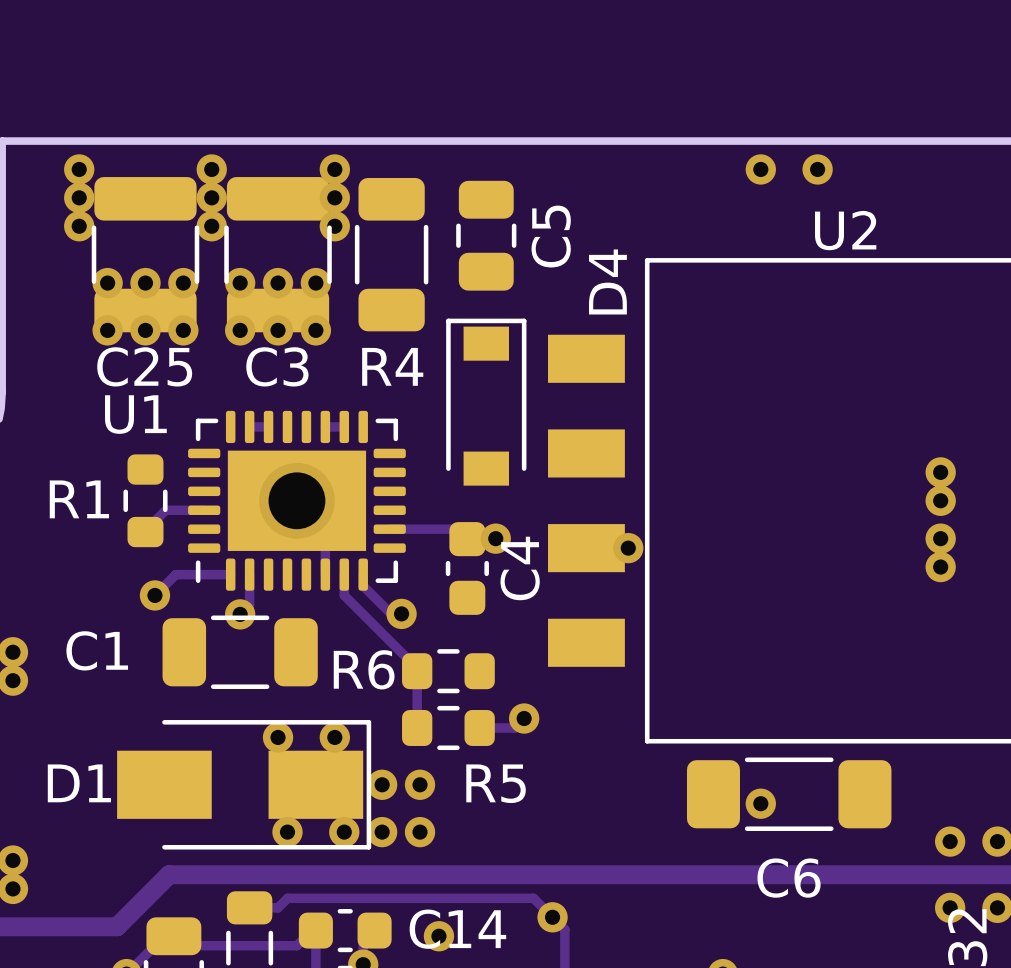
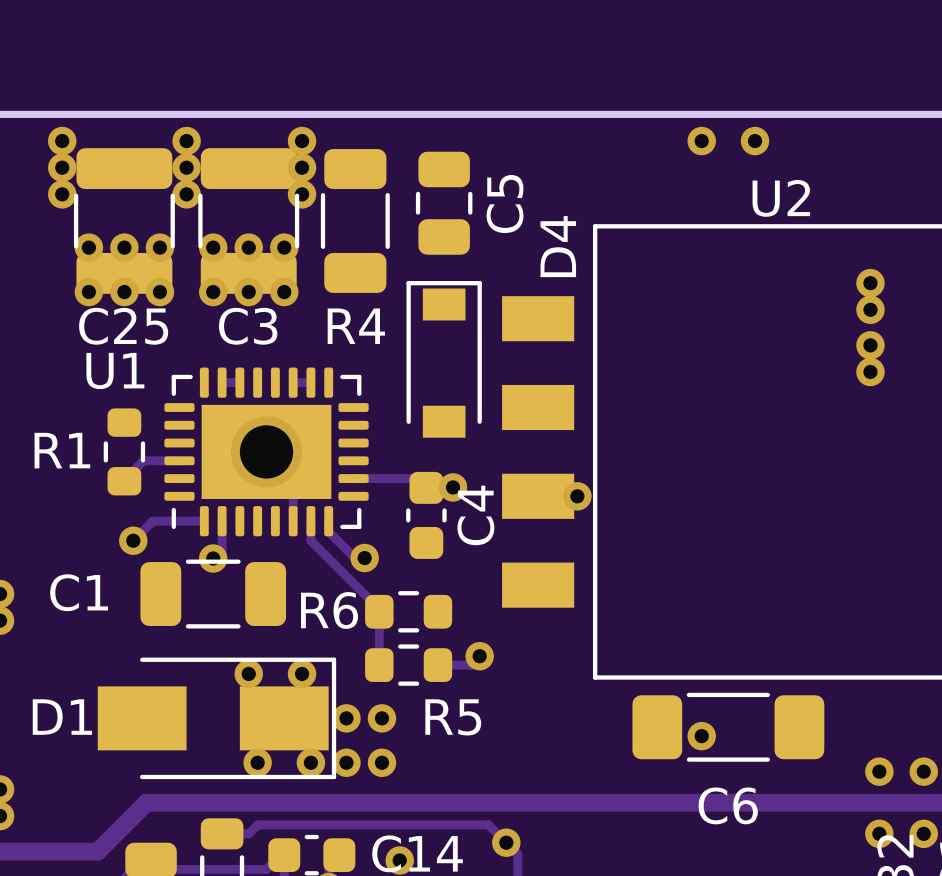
via: none -> (870, 283)
via: none -> (870, 309)
via: none -> (870, 345)
via: none -> (870, 371)
via: (940, 472) -> none
via: (940, 500) -> none
via: (940, 538) -> none
via: (940, 567) -> none

